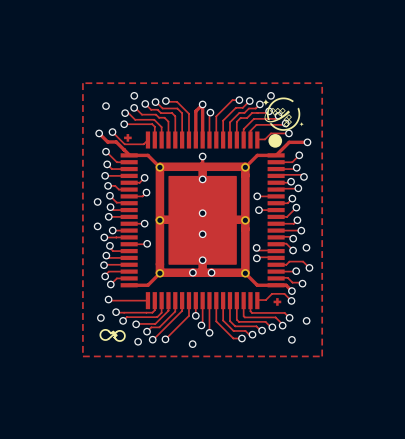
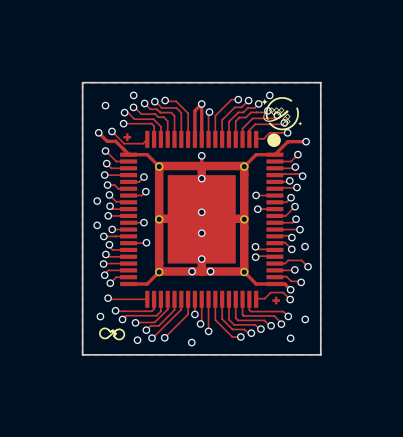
board edge: none -> (82, 82) (320, 82) (320, 354) (82, 354) (82, 82)

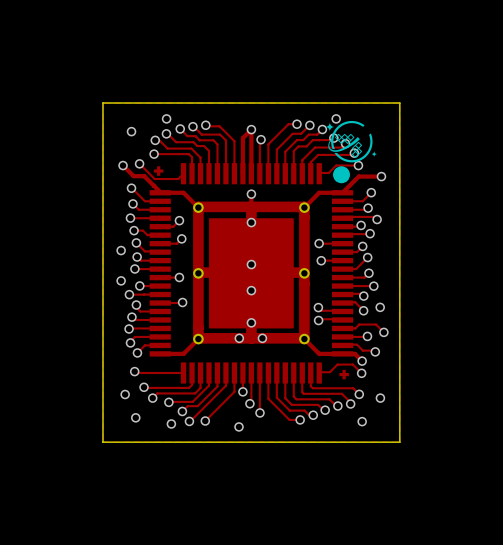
line: (112, 329) (116, 333) -> none
line: (108, 330) (111, 330) (115, 334) (113, 335) (117, 339) (124, 336) (123, 331) (119, 329) (116, 330) (108, 337) (107, 338) (101, 336) (101, 329) (108, 330) -> none
via: none -> (135, 417)

